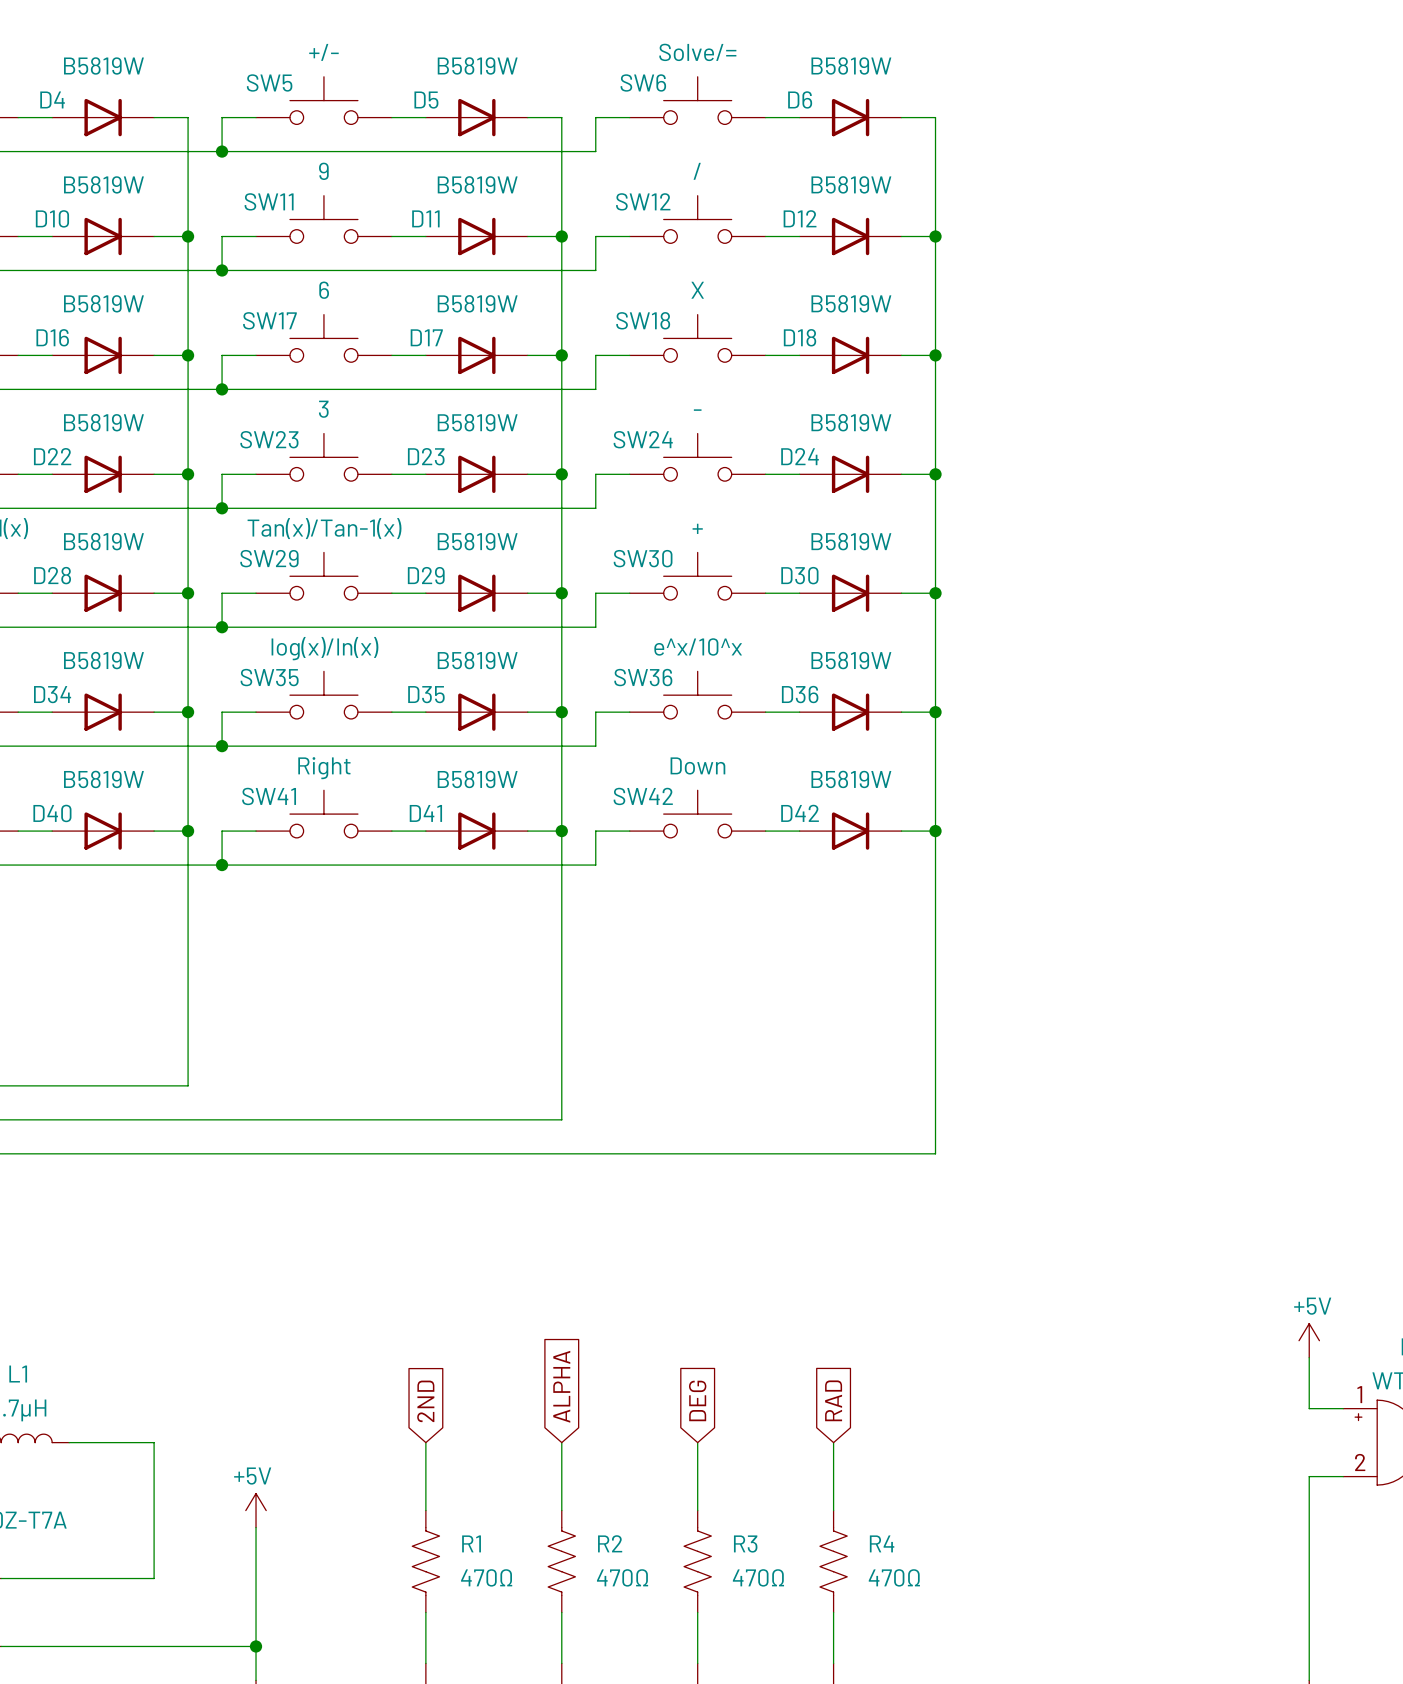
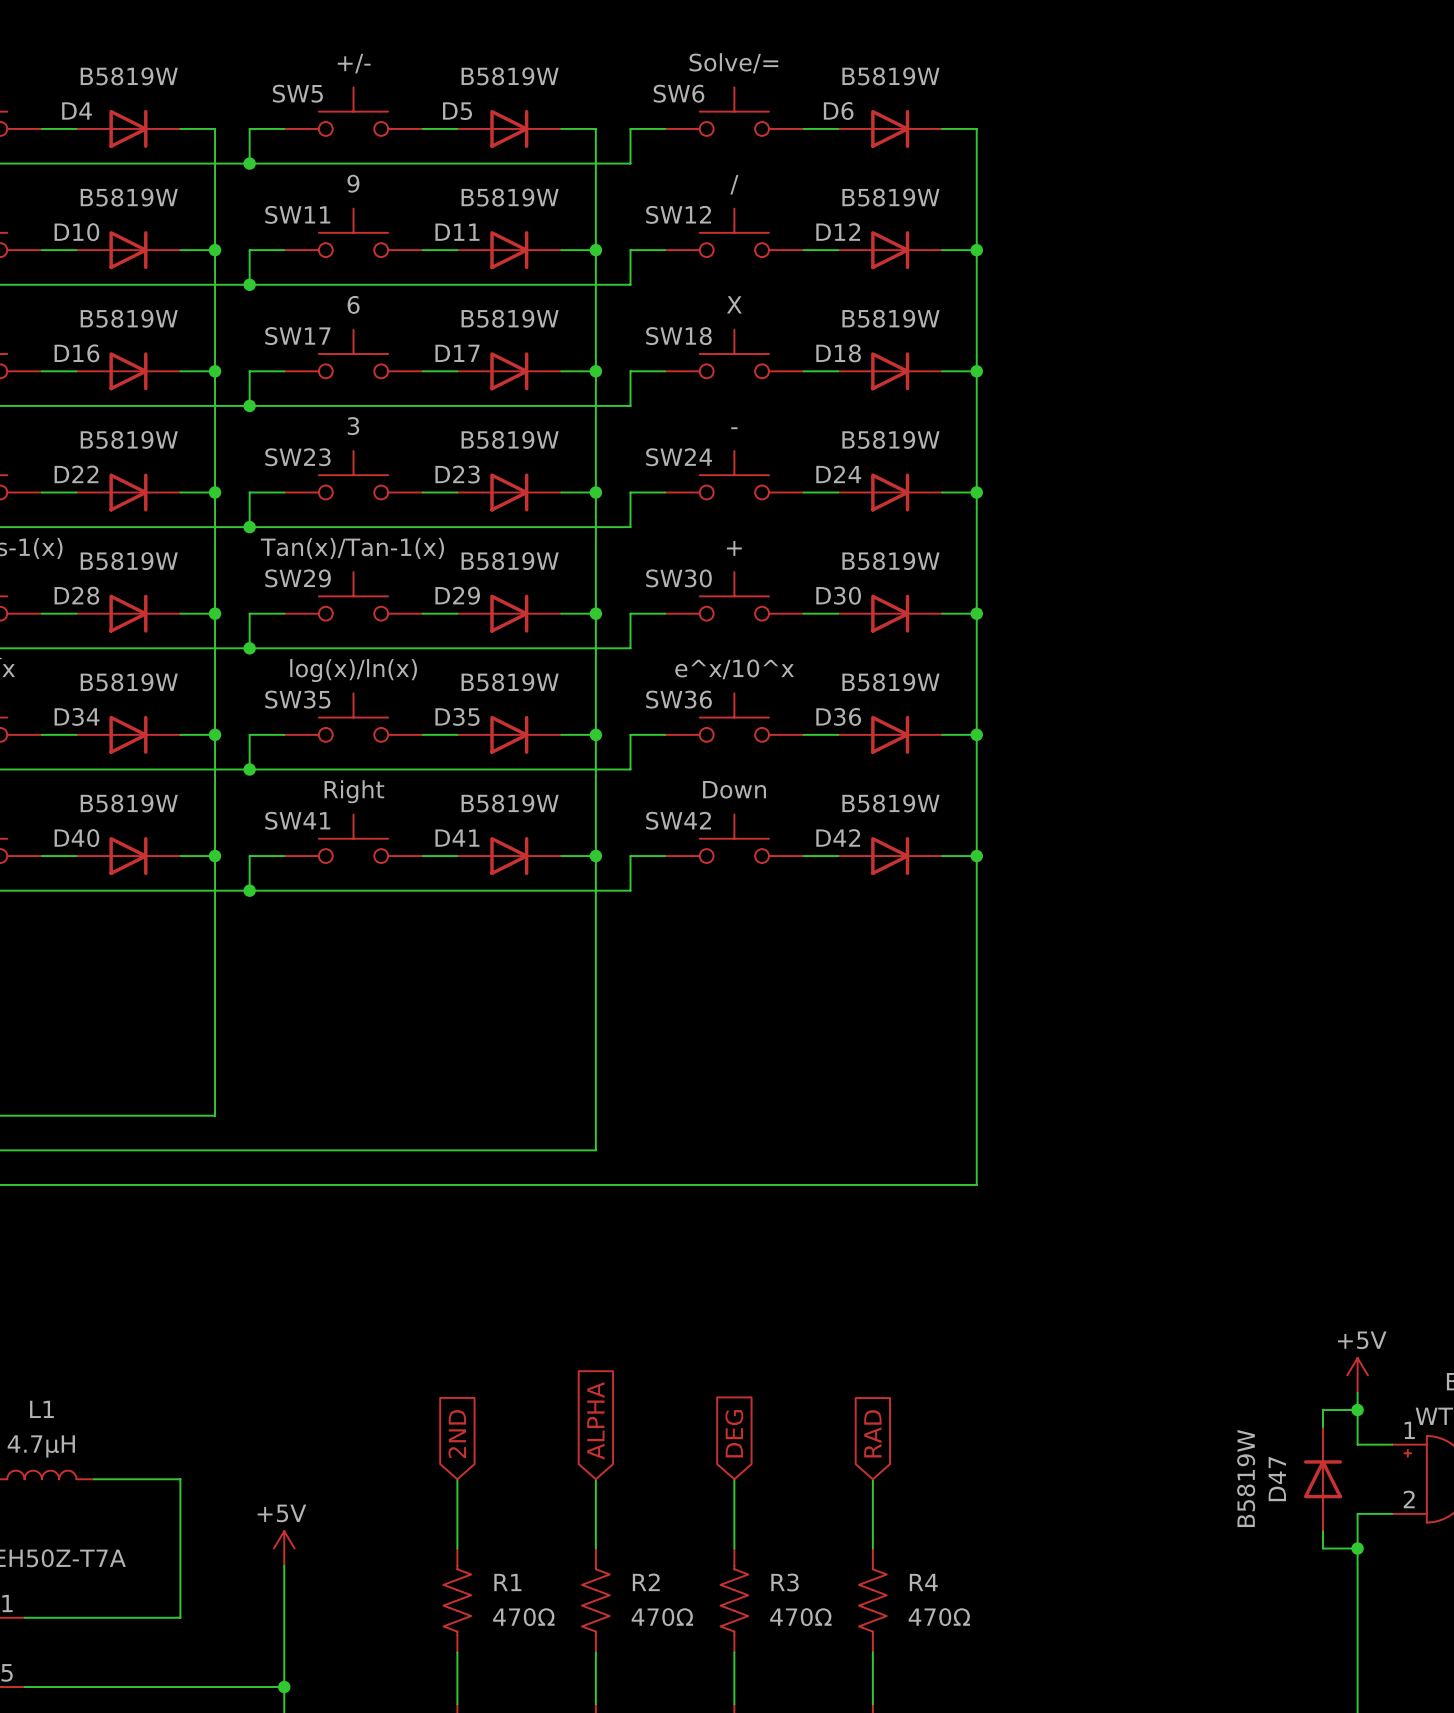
wire: none -> (1357, 1410) (1322, 1410) (1322, 1427)
junction: none -> (1357, 1410)
D47: none -> B5819W (1322, 1479)
wire: none -> (1322, 1531) (1322, 1548) (1357, 1548)
junction: none -> (1357, 1548)

